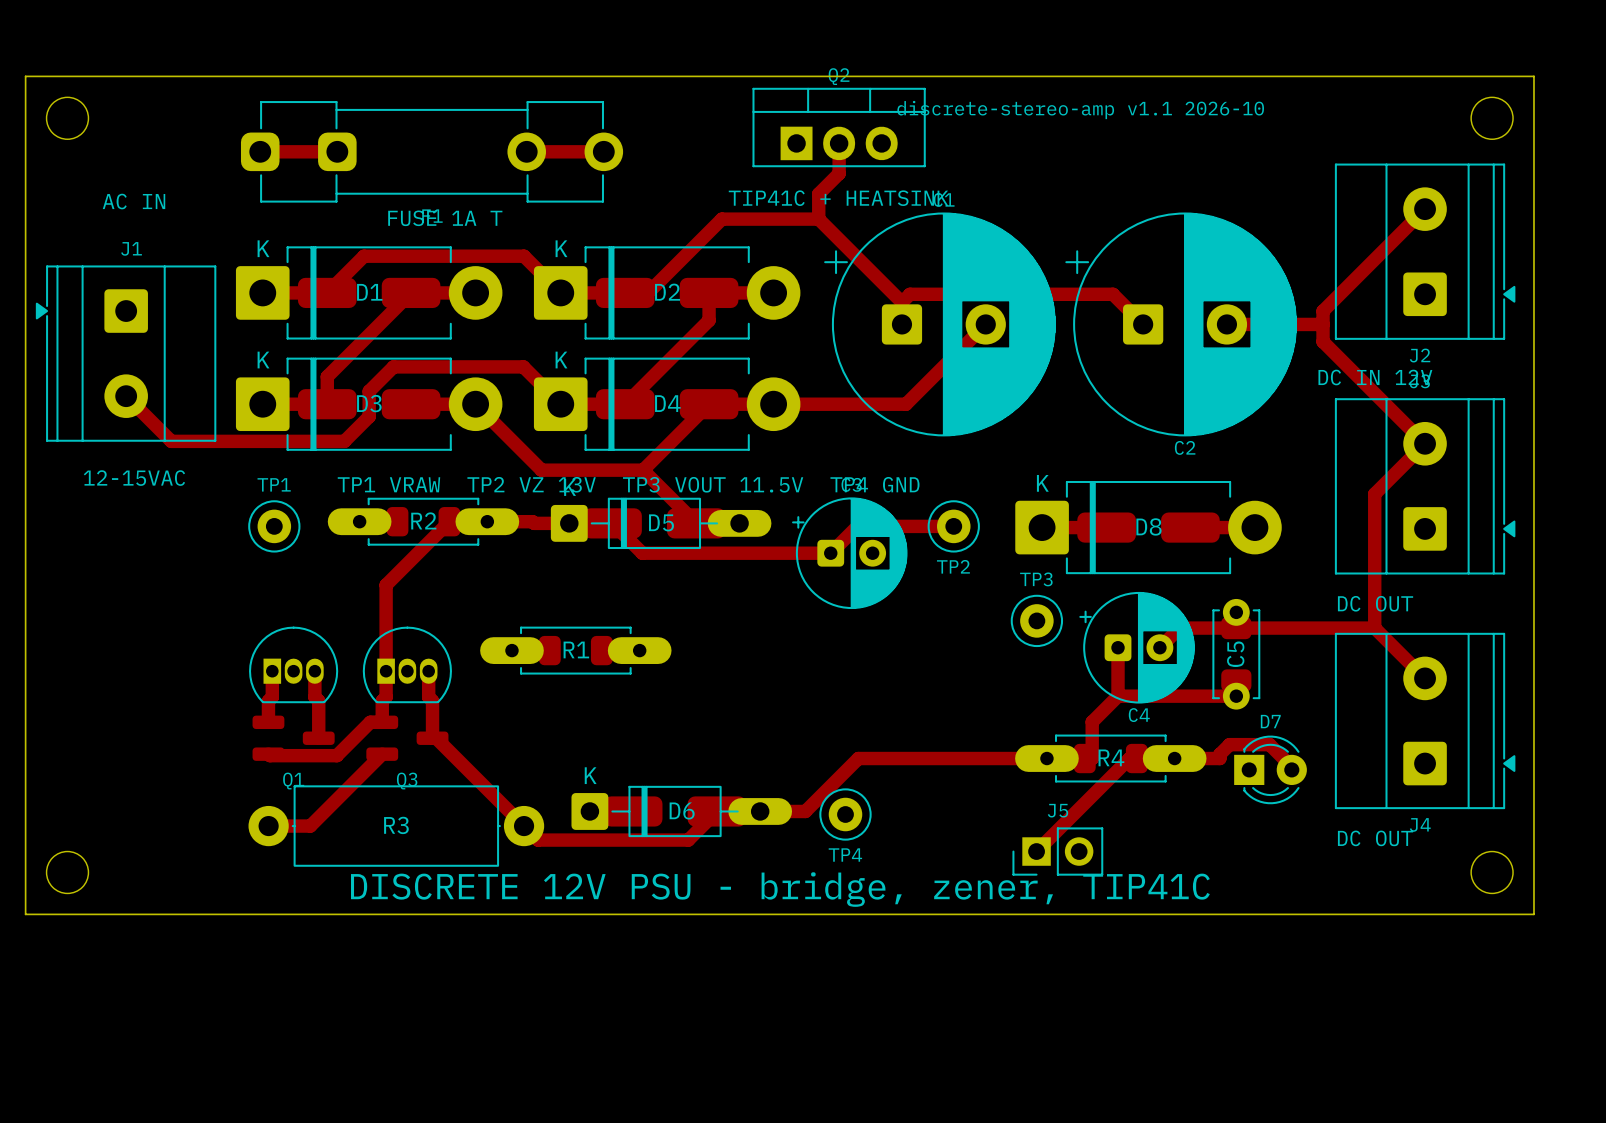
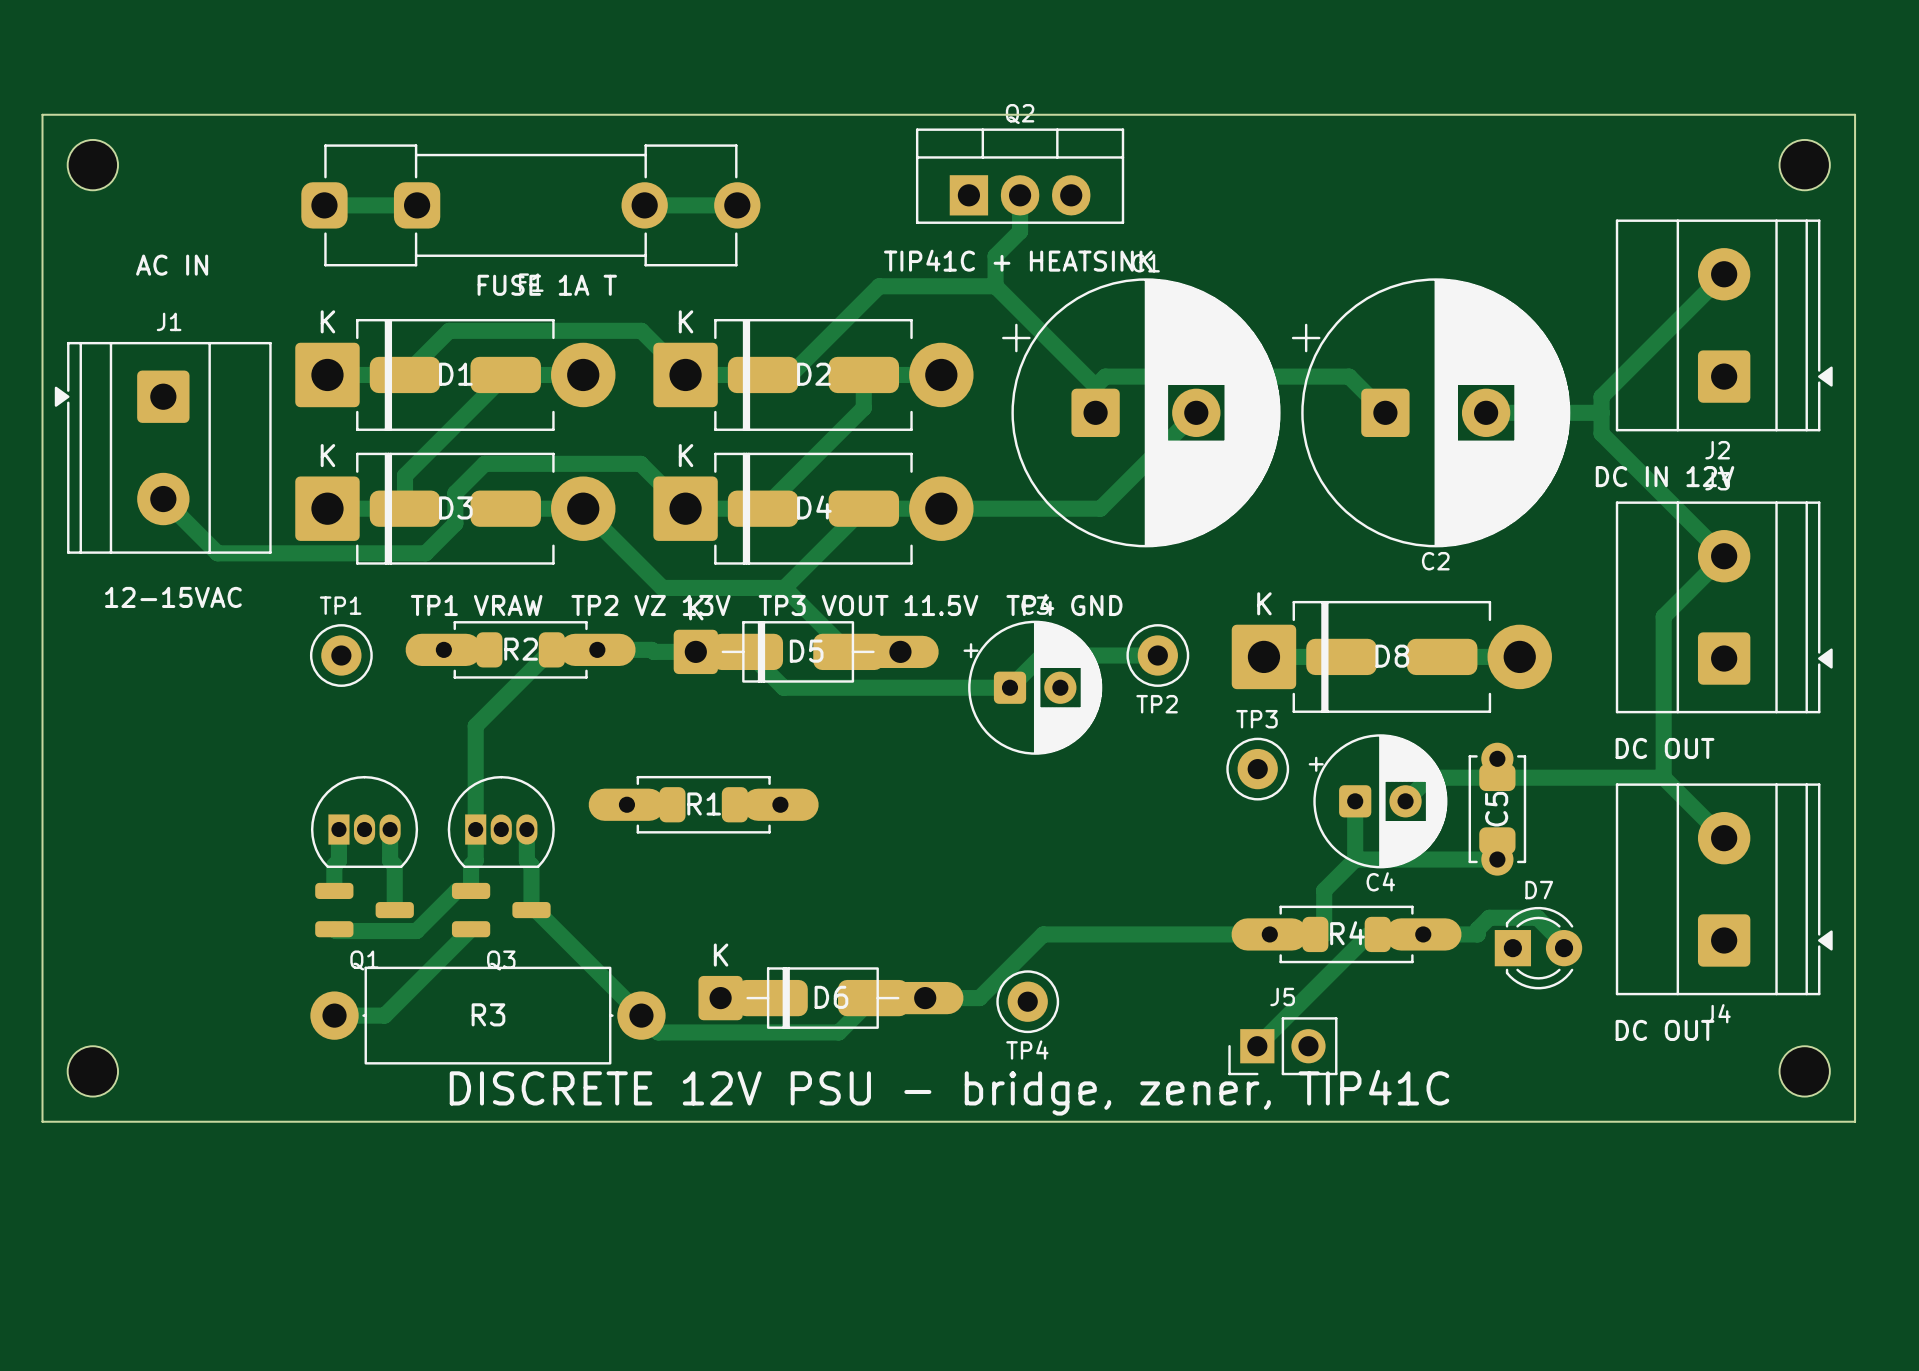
text: discrete-stereo-amp v1.1 2026-10 (1080, 110) -> none

